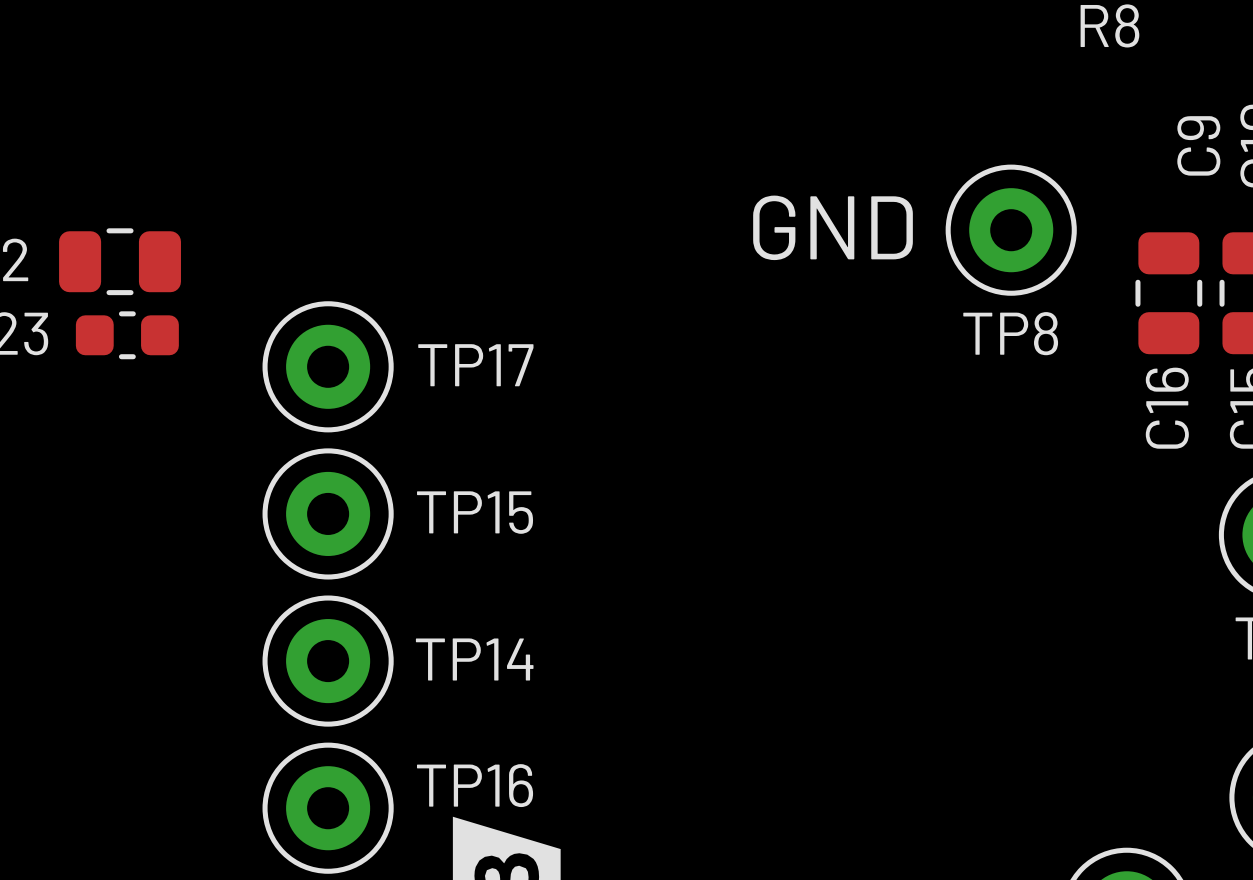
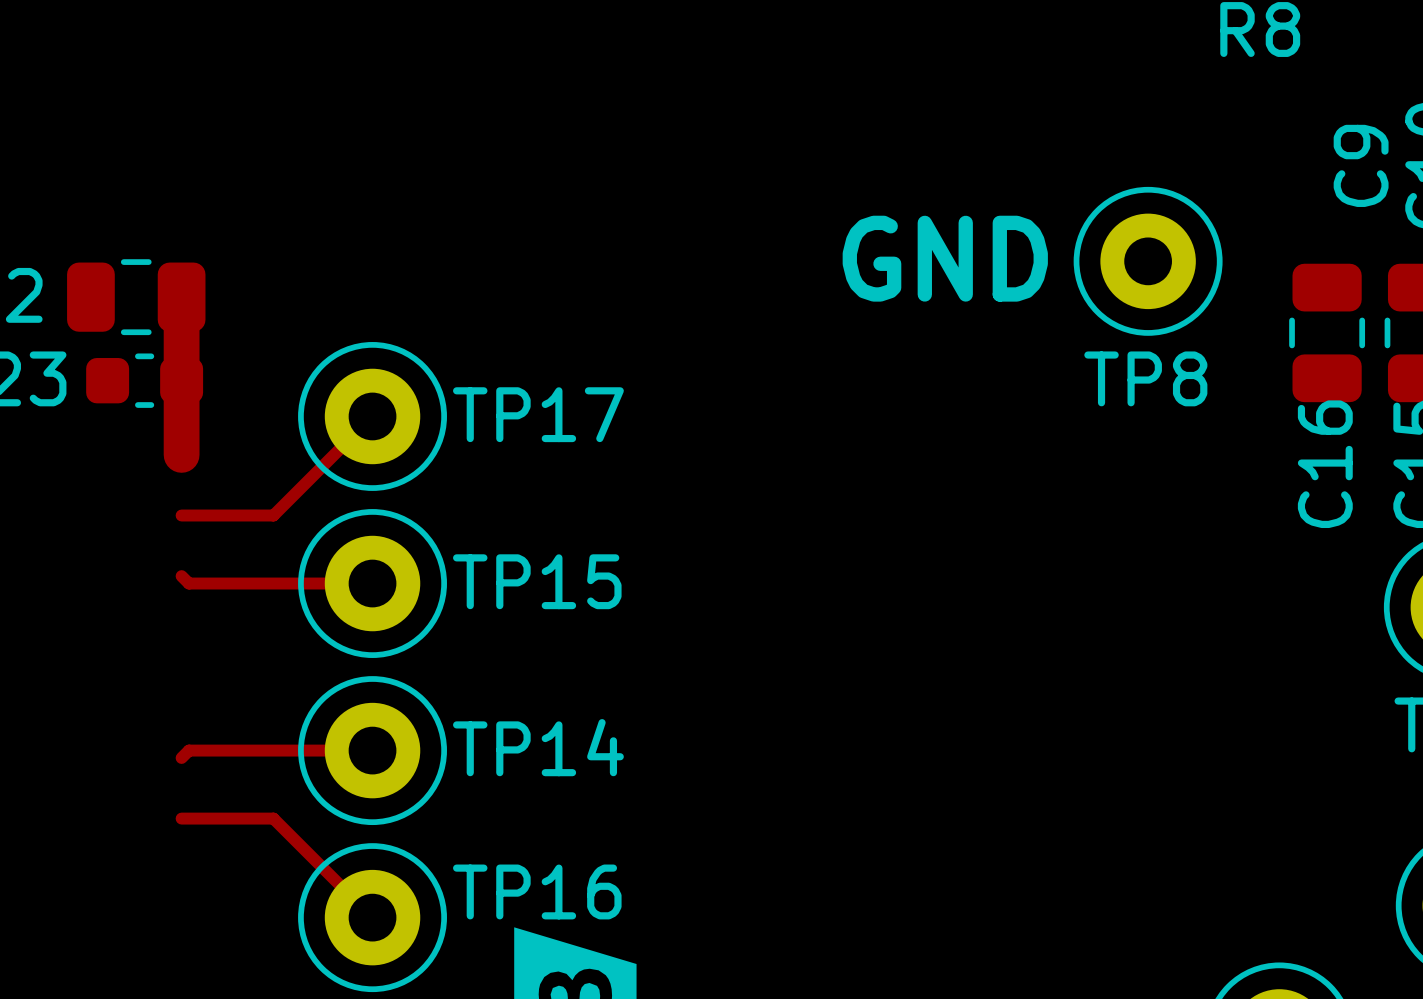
track: none -> (181, 297) (181, 454)
track: none -> (372, 416) (273, 515) (181, 515)
track: none -> (181, 576) (189, 583) (372, 583)
track: none -> (372, 750) (189, 750) (181, 757)
track: none -> (181, 818) (273, 818) (372, 917)

